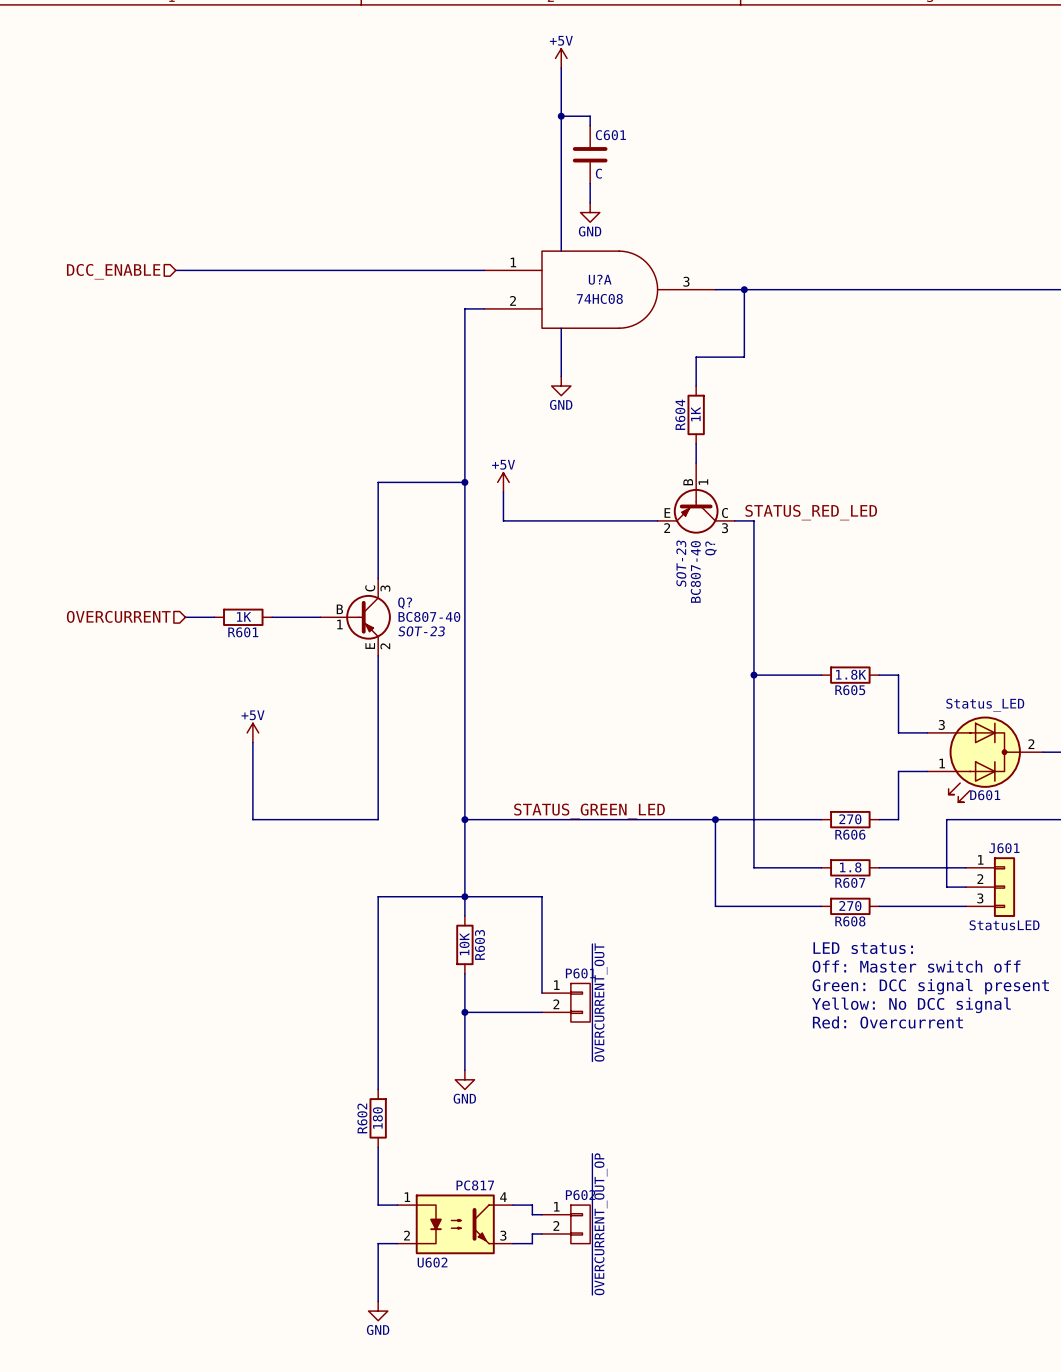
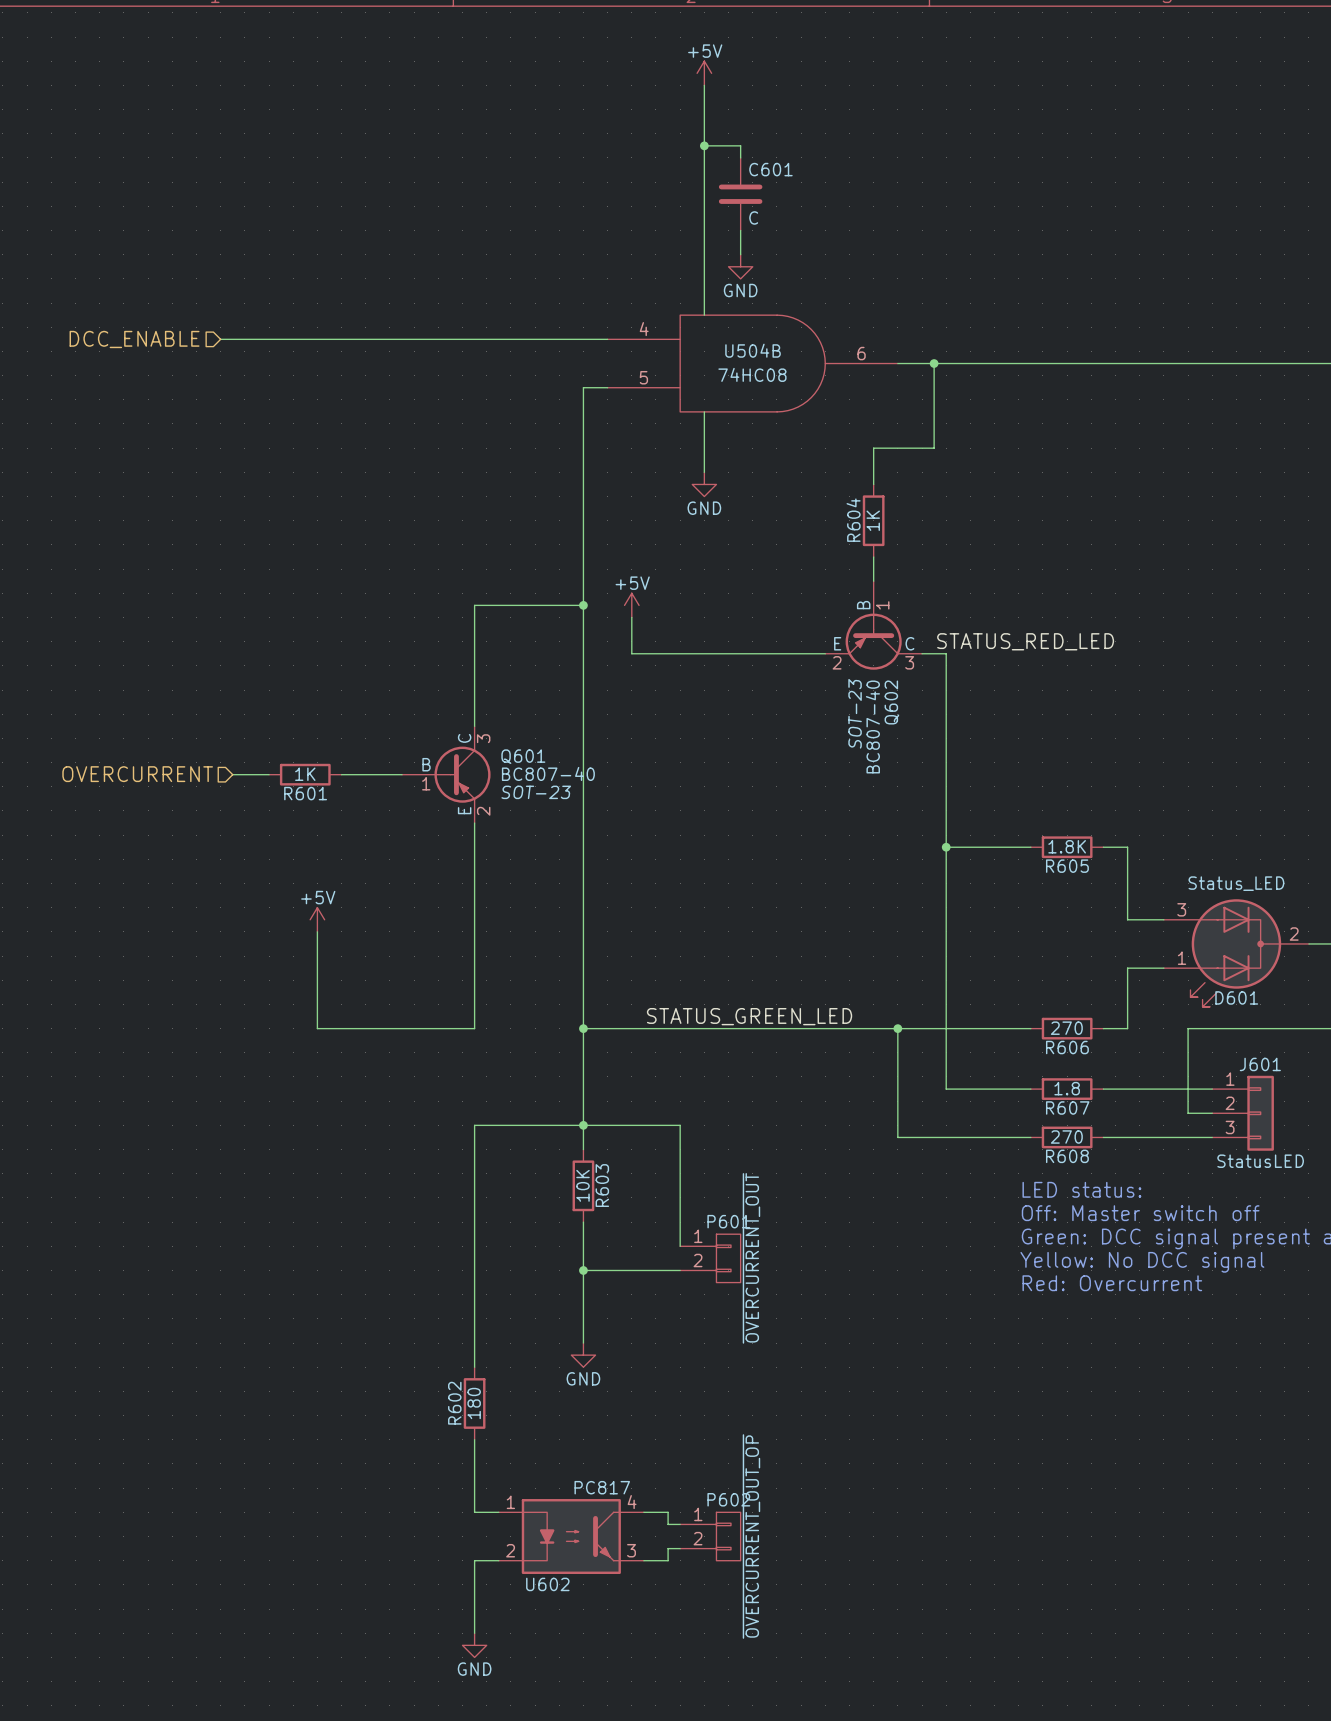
U?A pin number: 1 (513, 262) -> 4 (644, 329)
U?A name: U?A (600, 279) -> U504B (753, 350)
U?A pin number: 3 (686, 281) -> 6 (861, 353)
U?A pin number: 2 (513, 300) -> 5 (643, 377)
Q? name: Q? (711, 548) -> Q602 (891, 702)
Q? name: Q? (405, 603) -> Q601 (523, 756)

